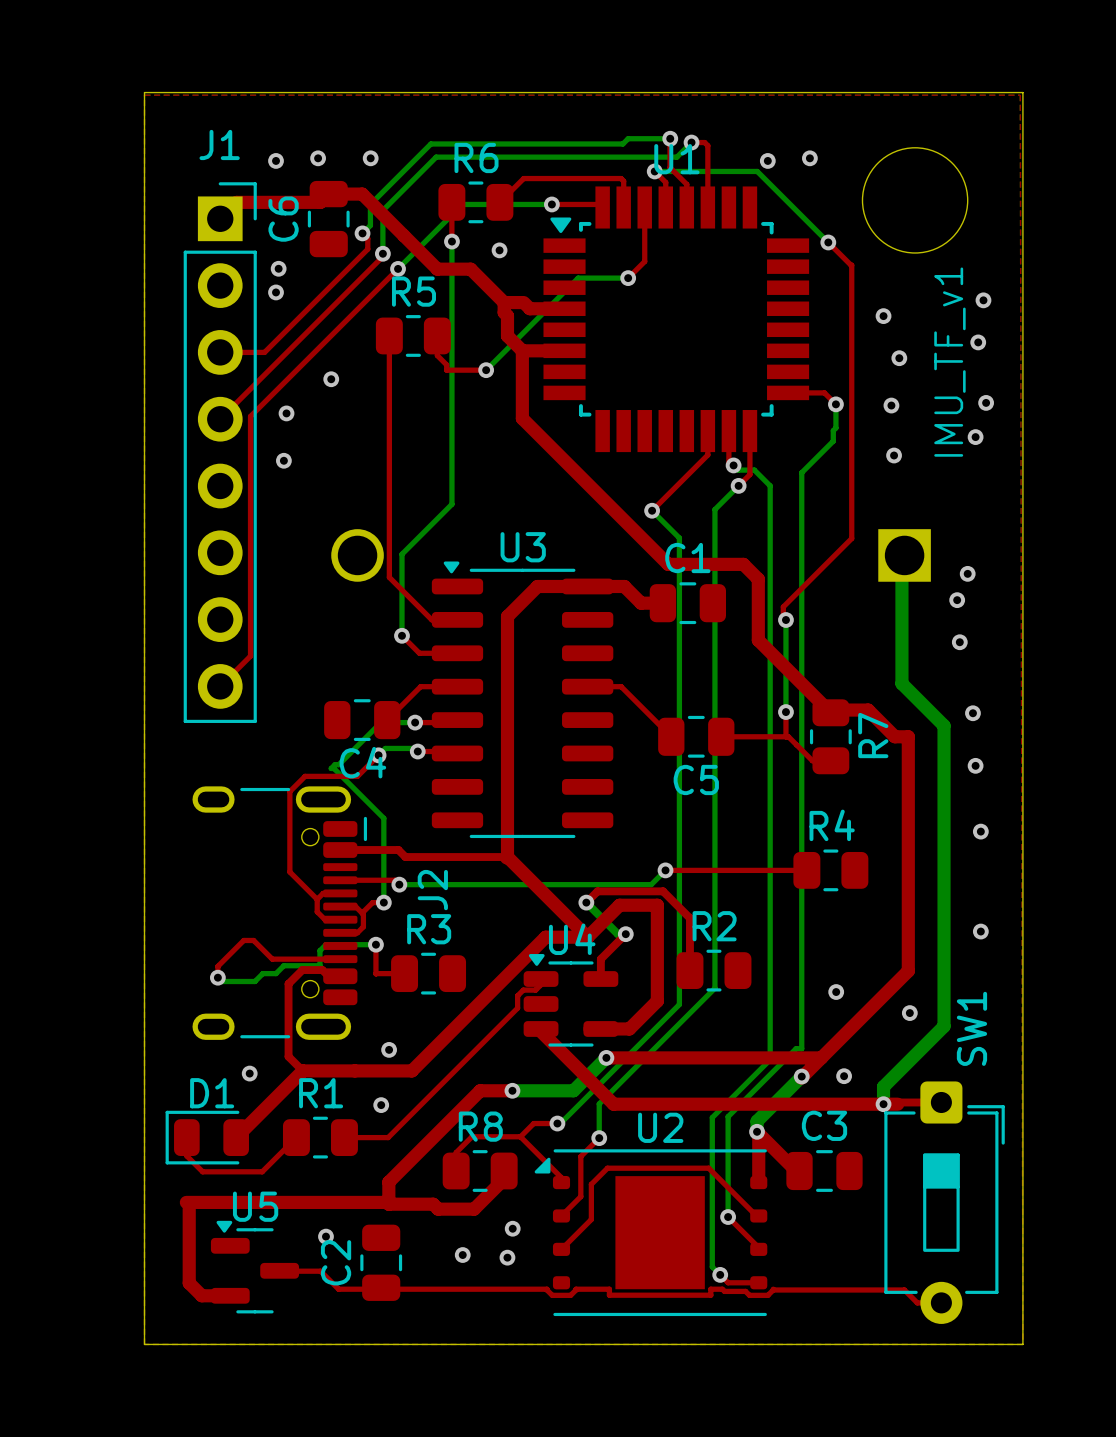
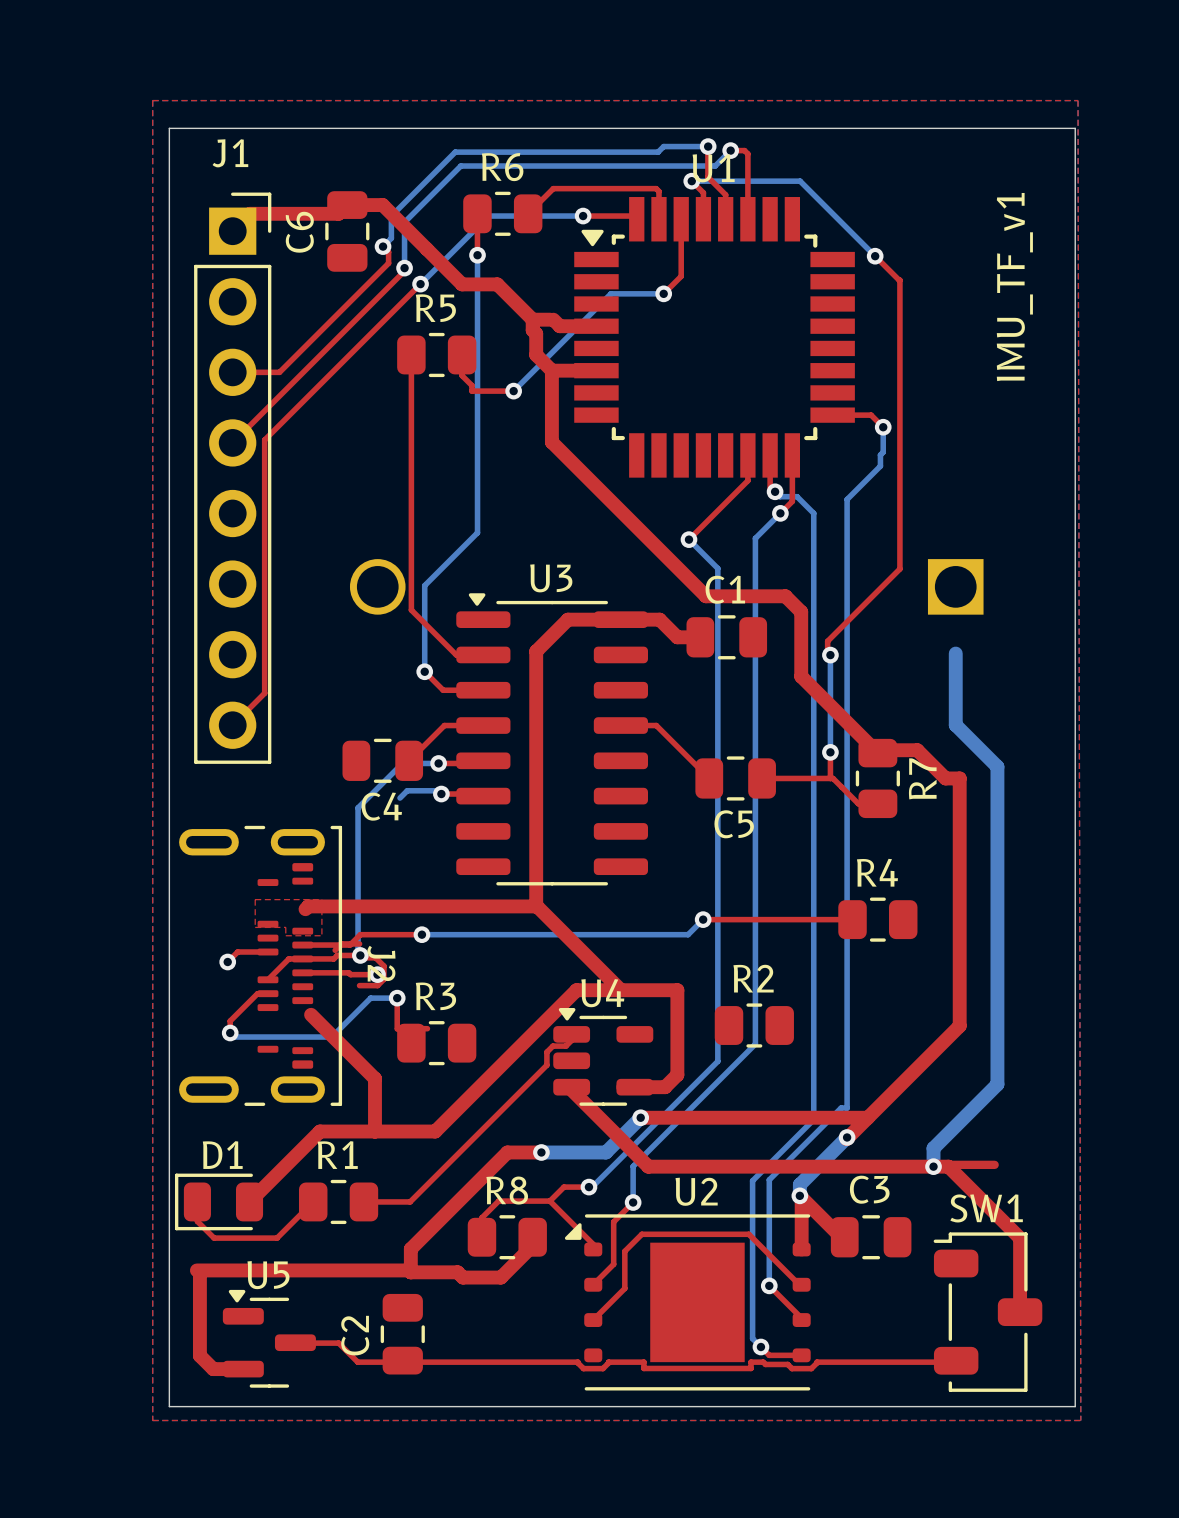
board edge: (144, 92) (1022, 92) (1022, 1344) (144, 1344) (144, 92) -> (169, 128) (169, 1406) (1075, 1406) (1075, 128) (169, 128)
round board edge: [861, 147, 969, 254] -> none
via: (318, 158) -> none
via: (370, 158) -> none
via: (809, 158) -> none
via: (276, 160) -> none
via: (767, 160) -> none
via: (499, 250) -> none
via: (278, 268) -> none
via: (276, 292) -> none
via: (983, 300) -> none
via: (883, 316) -> none
via: (978, 342) -> none
via: (899, 358) -> none
text position: IMU_TF_v1 (949, 362) -> IMU_TF_v1 (1014, 287)
via: (331, 379) -> none
via: (986, 402) -> none
via: (891, 405) -> none
via: (286, 413) -> none
via: (975, 437) -> none
via: (894, 455) -> none
via: (283, 460) -> none
bottom track: (904, 555) (901, 558) (901, 683) (904, 686) -> (955, 653) (955, 725)
via: (967, 573) -> none
via: (957, 600) -> none
via: (959, 642) -> none
via: (972, 713) -> none
top track: (378, 755) (357, 776) (305, 776) (289, 791) (289, 872) (317, 899) (317, 911) (325, 919) (340, 919) -> none
via: (378, 755) -> none
bottom track: (338, 764) (335, 764) (331, 768) (333, 768) (383, 818) (383, 902) -> (358, 807) (358, 953) (360, 955)
via: (975, 765) -> none
J2 footprint: [192, 786, 368, 1040] -> [179, 825, 343, 1106]
via: (980, 831) -> none
top track: (340, 850) (398, 850) (405, 857) (507, 857) -> none
top zone outline: none -> (255, 899) (321, 899) (321, 935) (285, 935) (285, 927) (255, 927) (255, 899)
top track: none -> (535, 906) (308, 906) (305, 909)
top track: (340, 880) (394, 880) (399, 884) -> (302, 945) (350, 945) (360, 934) (421, 934)
top track: none -> (268, 952) (237, 952) (227, 962)
top track: (383, 902) (372, 902) (362, 913) -> none
via: (383, 902) -> none
top track: (586, 902) (597, 891) (663, 891) (689, 918) (689, 970) -> none
bottom track: (586, 902) (617, 934) (625, 934) -> none
via: (586, 902) -> none
top track: none -> (360, 955) (337, 955) (333, 958) (288, 958) (268, 979)
via: none -> (360, 955)
via: none -> (227, 962)
top track: none -> (302, 972) (377, 974)
via: none -> (377, 974)
via: (980, 931) -> none
top track: (625, 934) (600, 959) (600, 979) -> none
via: (625, 934) -> none
top track: (587, 937) (619, 905) (657, 905) (657, 1001) (641, 1017) -> (620, 990) (677, 990) (677, 1074)
top track: (253, 940) (272, 959) (340, 959) -> none
bottom track: (350, 944) (325, 944) (319, 950) (319, 965) (283, 965) (276, 973) (262, 973) (254, 981) -> (370, 998) (331, 1037) (269, 1037)
top track: none -> (311, 1014) (374, 1078) (374, 1131)
R3 position: (428, 973) -> (436, 1043)
top track: (340, 976) (328, 976) (322, 970) (302, 970) (288, 983) (288, 1056) (302, 1070) -> none
via: (836, 992) -> none
via: (909, 1013) -> none
SW1 name position: SW1 (971, 1028) -> SW1 (986, 1208)
via: (389, 1049) -> none
via: (249, 1073) -> none
via: (844, 1076) -> none
SW1 footprint: [884, 1081, 1005, 1324] -> [933, 1232, 1043, 1392]
top track: none -> (948, 1166) (1020, 1238) (1020, 1312)
via: (381, 1105) -> none
via: (512, 1228) -> none
via: (325, 1236) -> none
via: (462, 1255) -> none
via: (507, 1257) -> none
top track: (773, 1290) (904, 1290) (917, 1302) (941, 1302) -> (817, 1362) (956, 1360)

